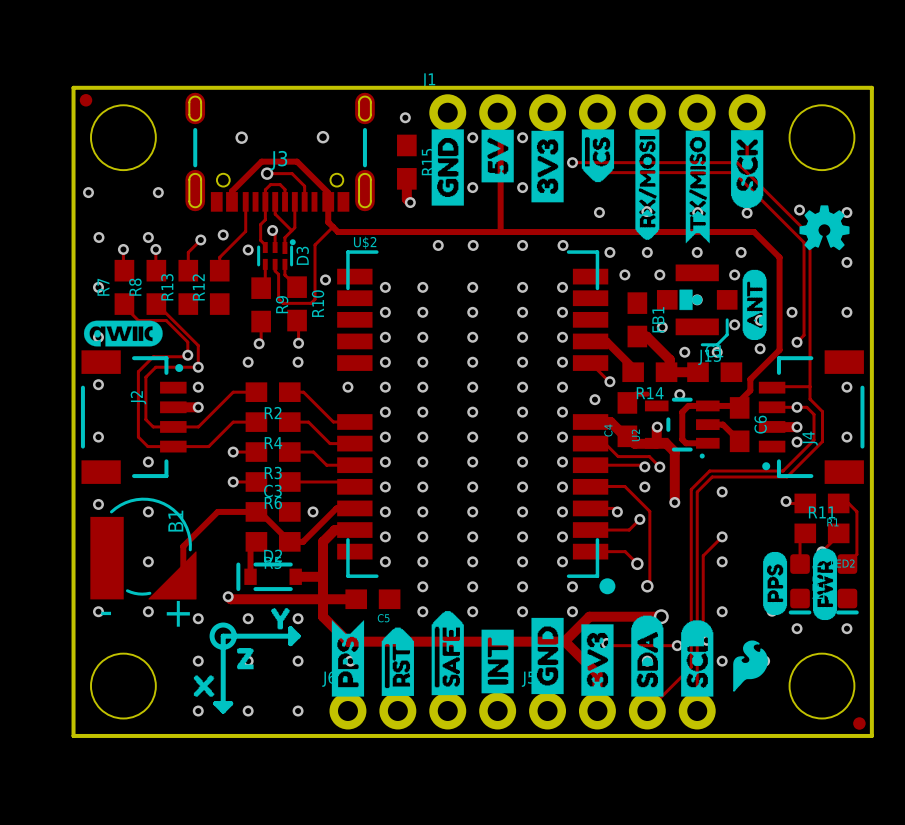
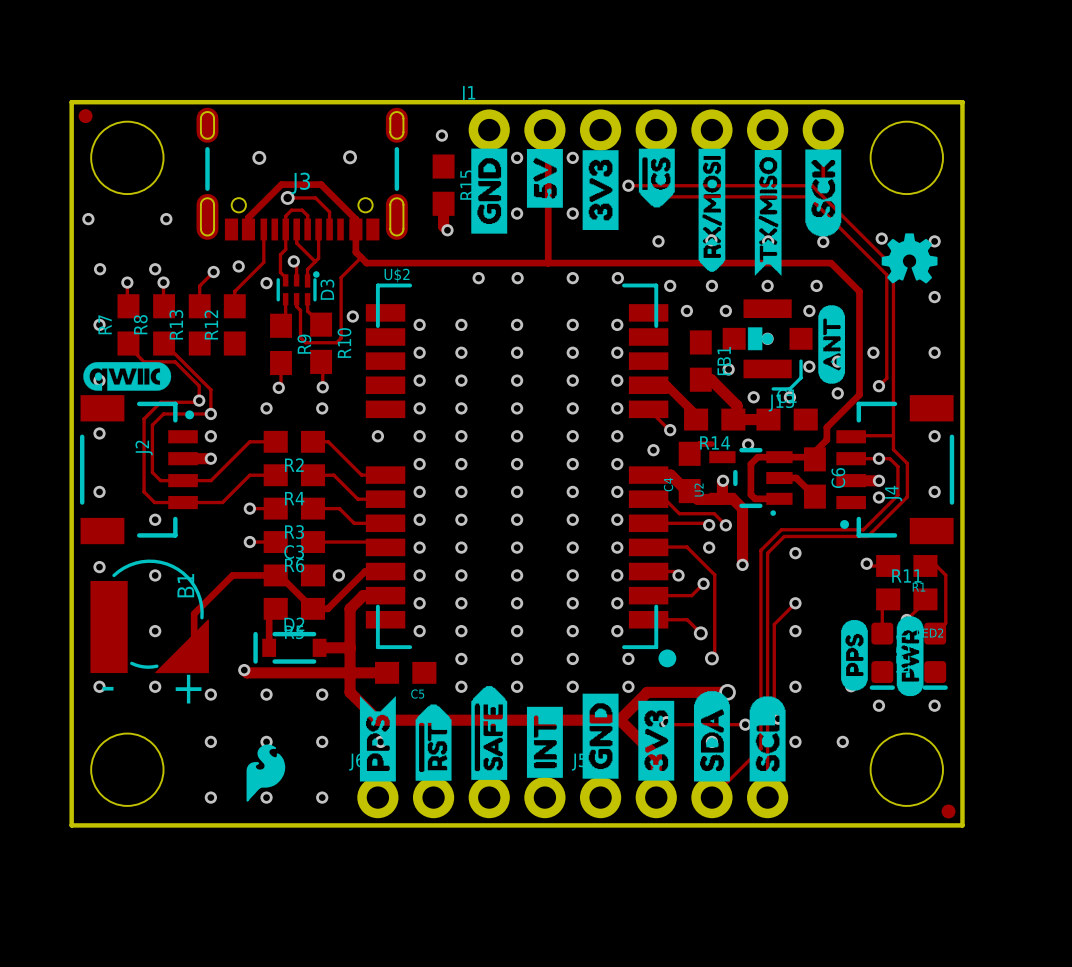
drawing: [271, 608, 291, 630] -> none
drawing: [209, 622, 254, 670] -> none
line: (298, 636) (223, 636) (223, 711) -> none
line: (298, 636) (290, 643) (290, 628) (298, 636) -> none
drawing: [733, 640, 768, 692] -> none
drawing: none -> [246, 744, 286, 802]
drawing: [193, 675, 215, 697] -> none
line: (223, 711) (215, 703) (230, 703) (223, 711) -> none

